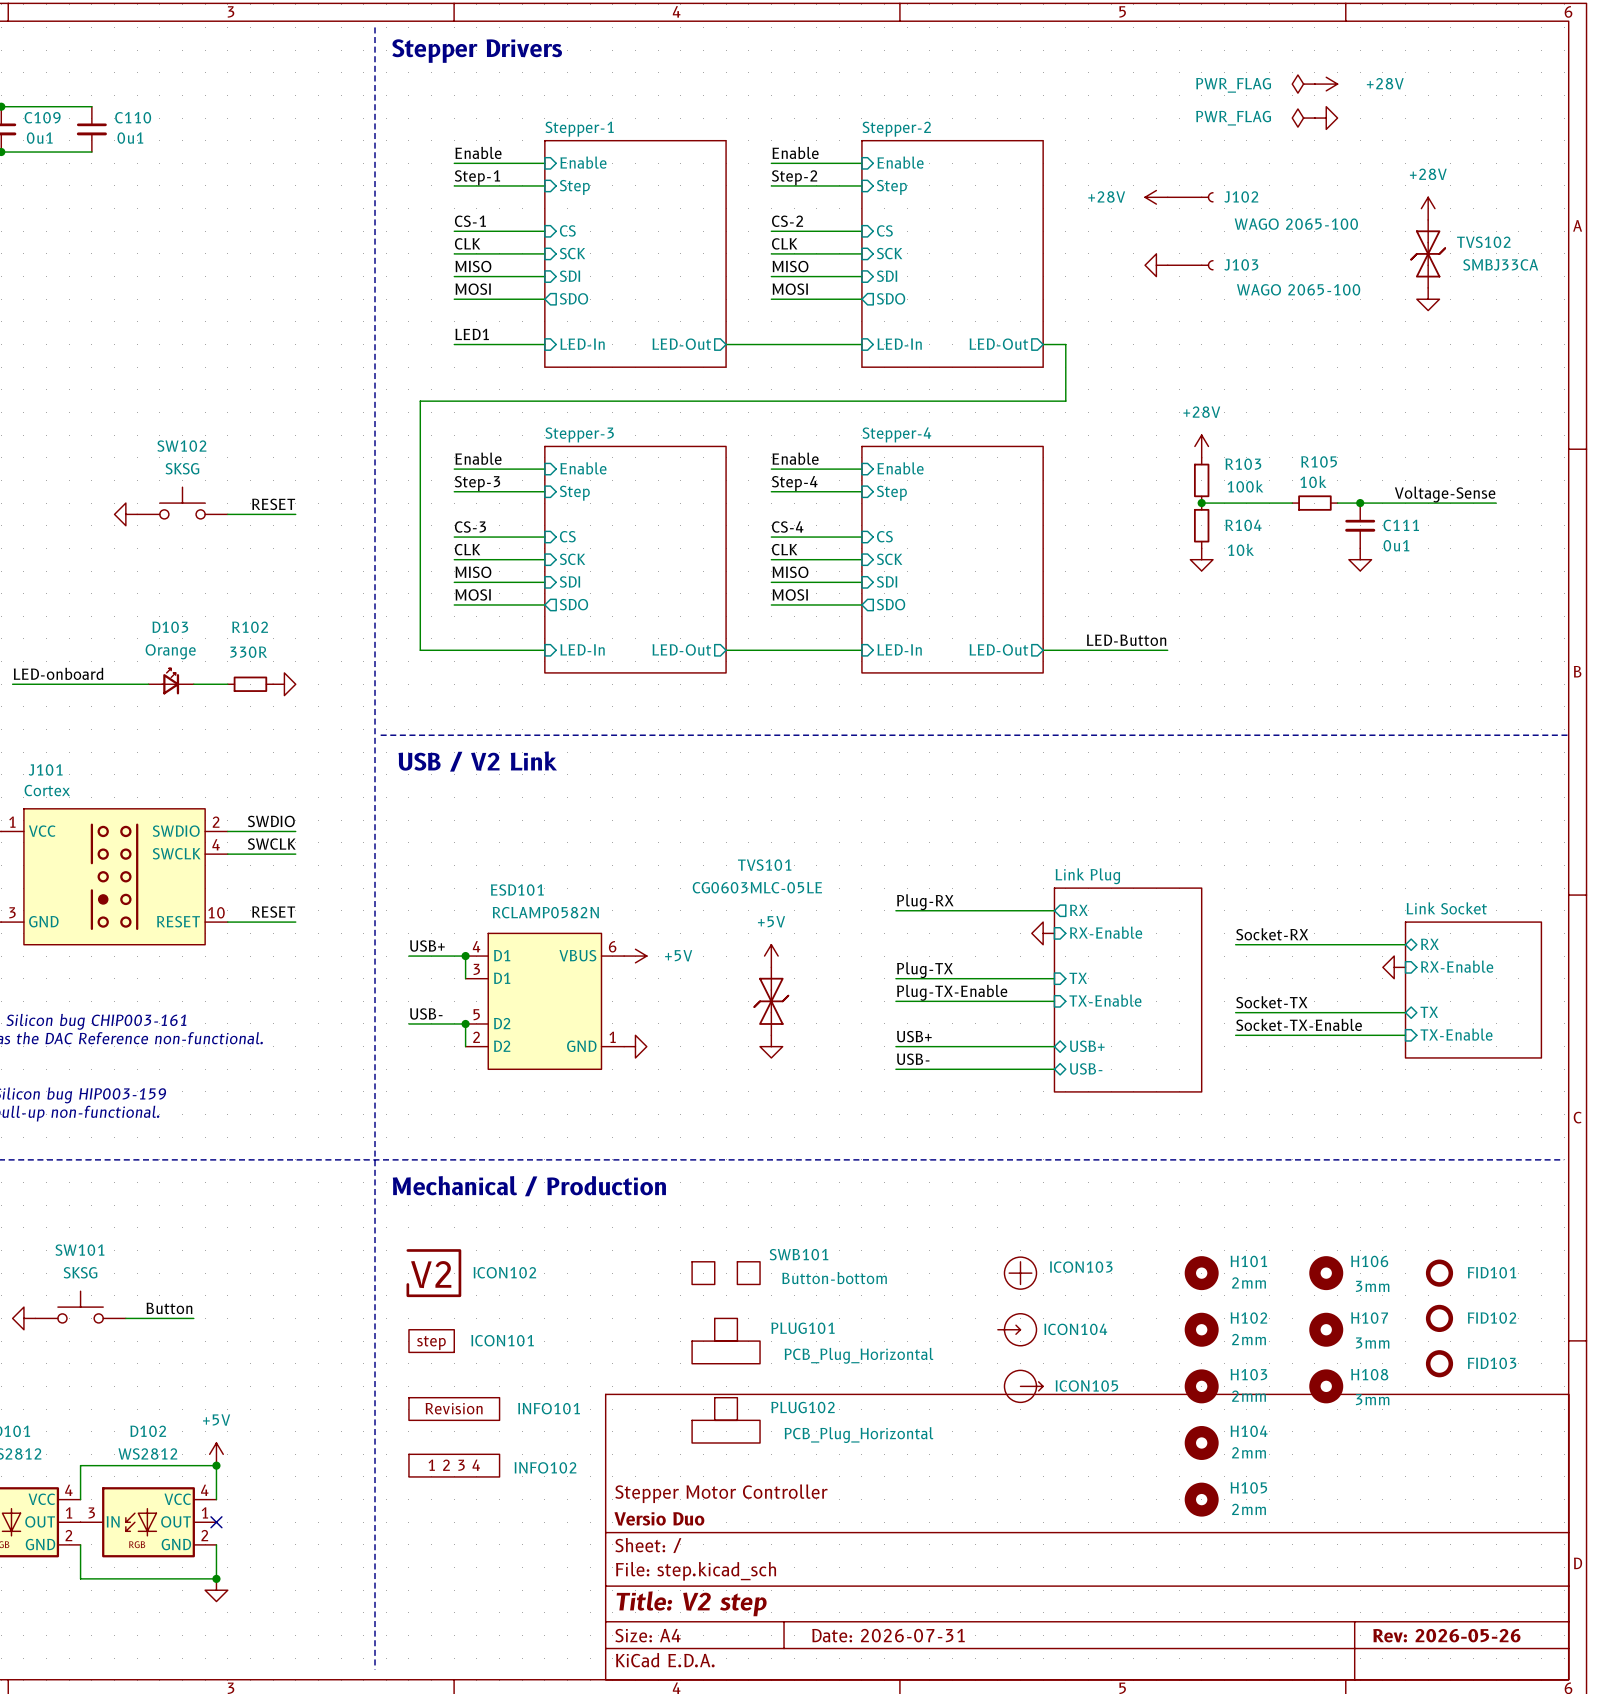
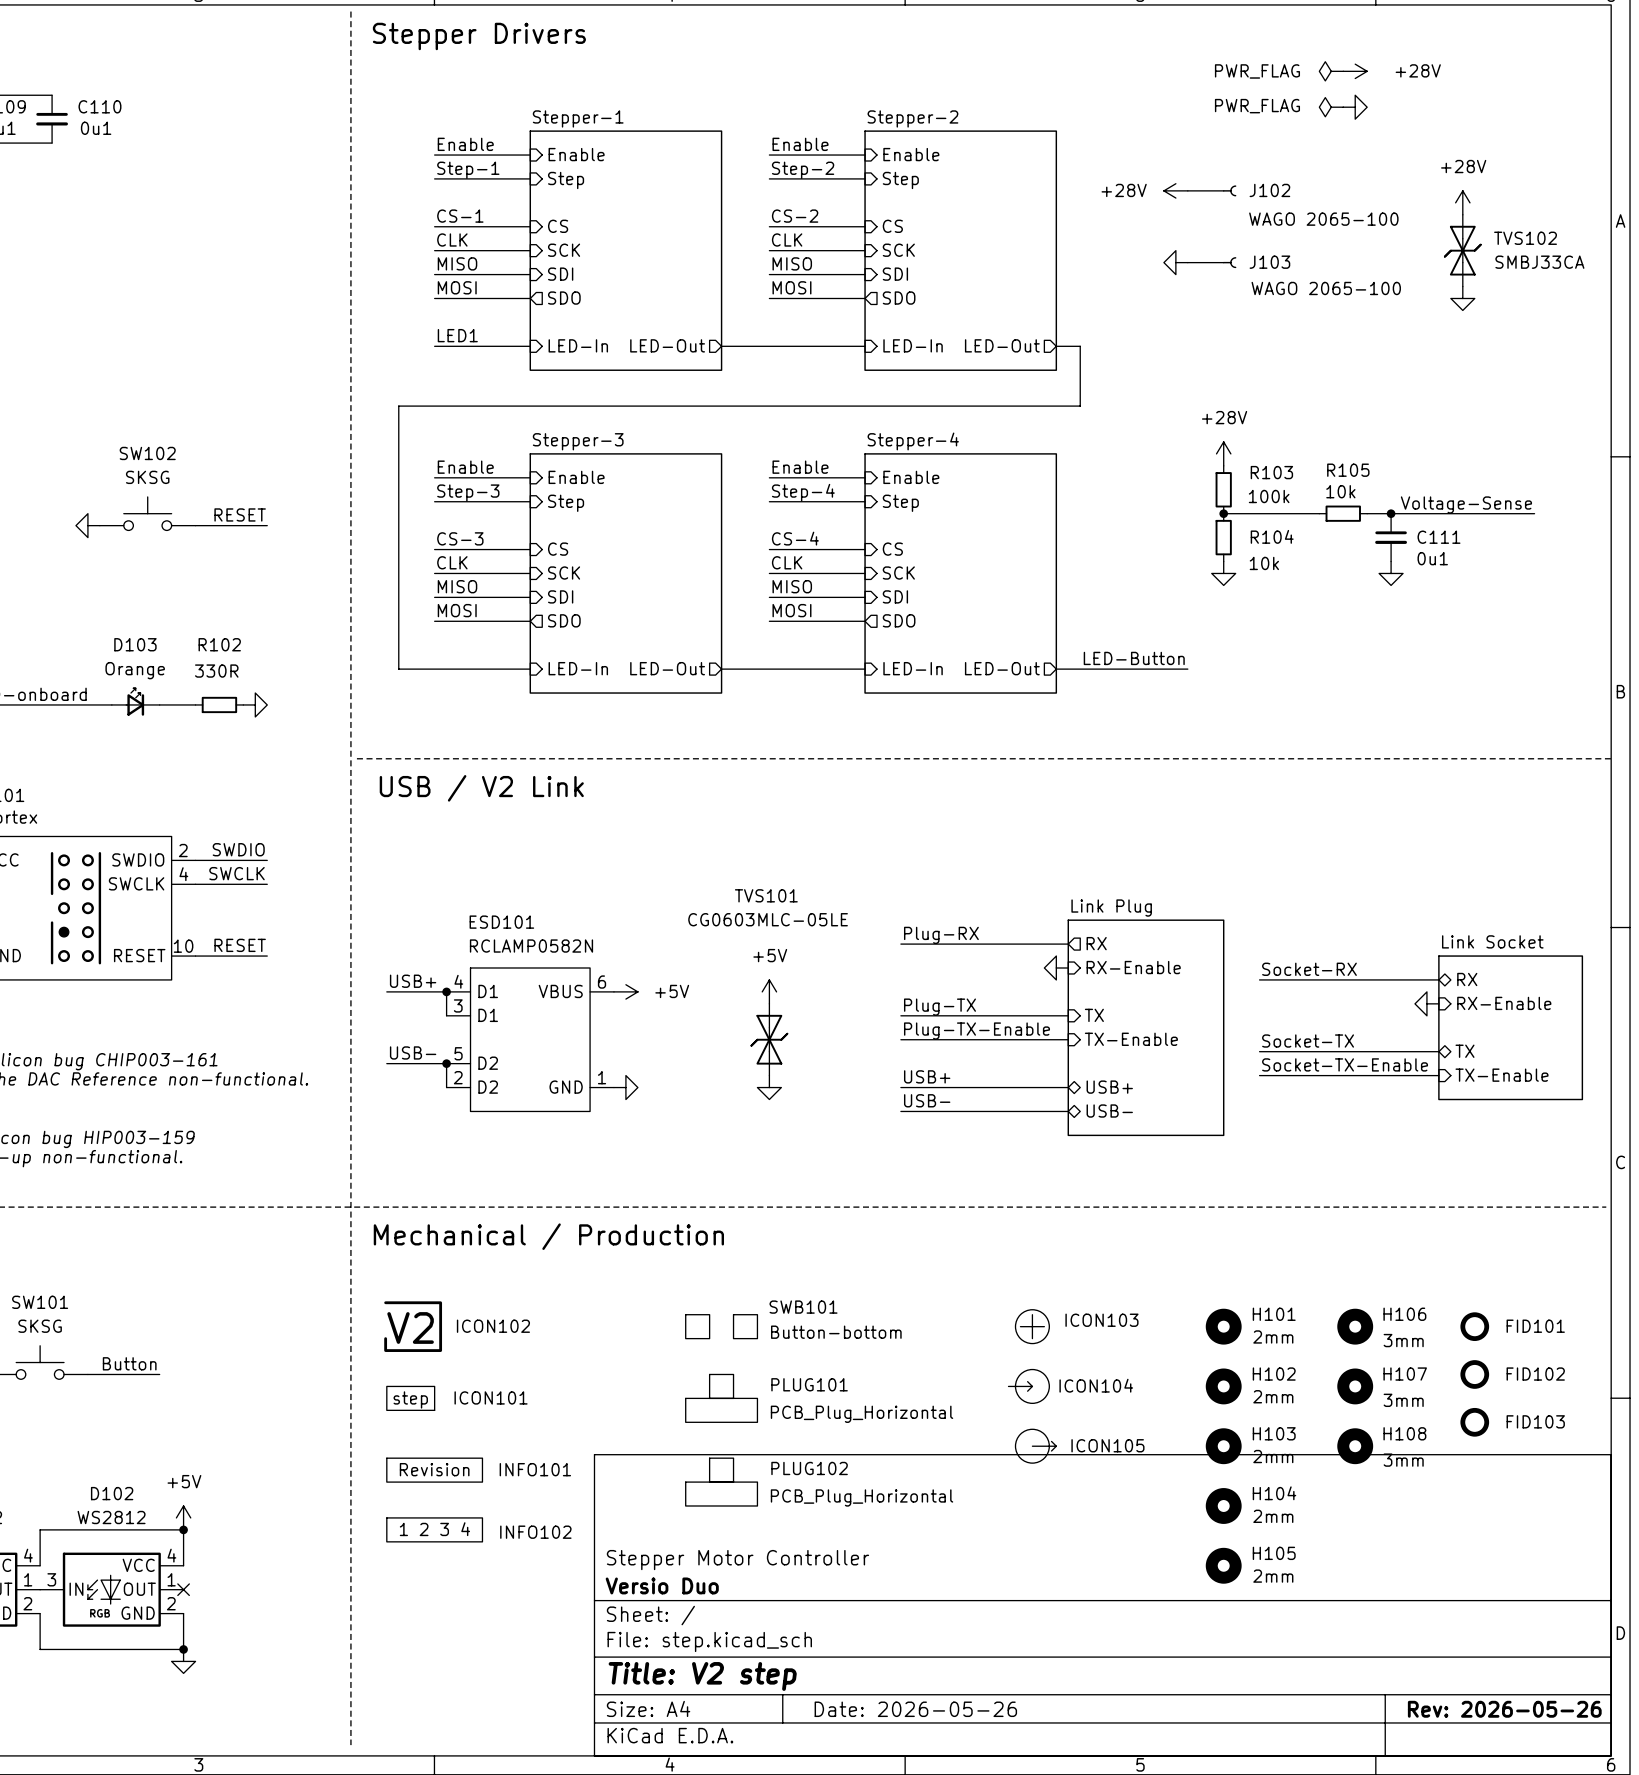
title block: Date: 2026-07-31 (888, 1635) -> Date: 2026-05-26 (915, 1709)

